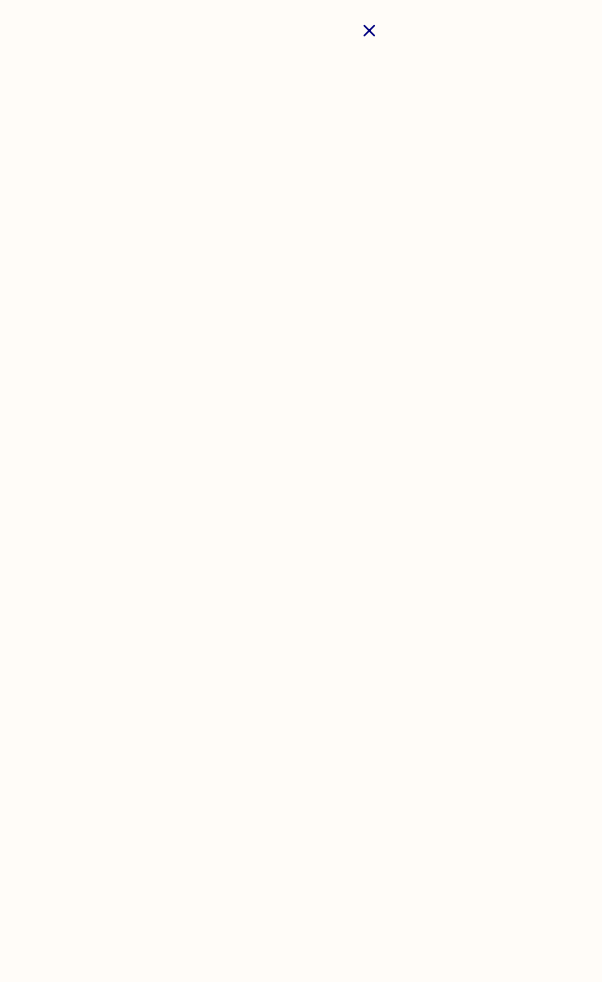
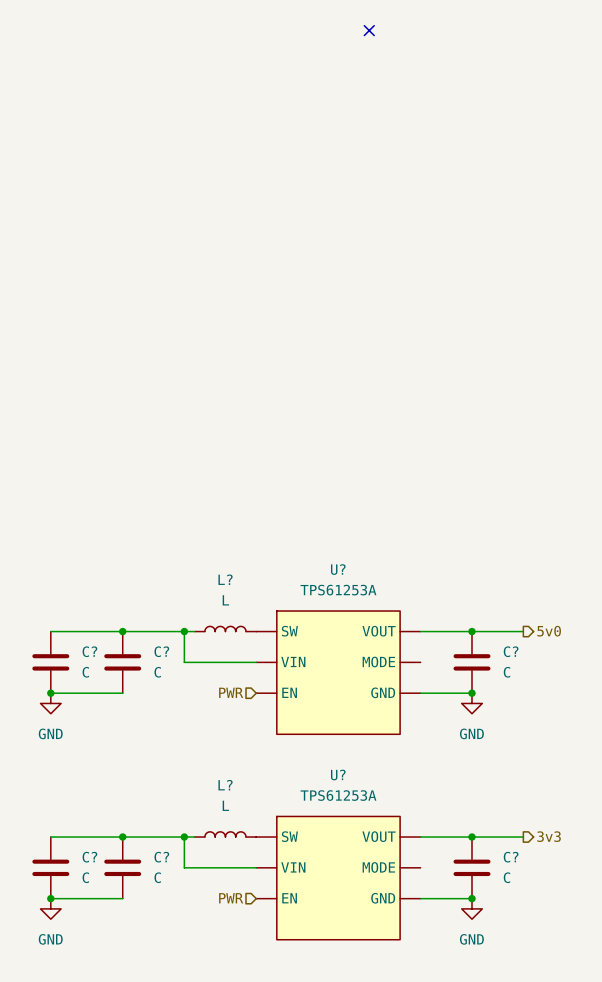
L?: none -> L (225, 628)
wire: none -> (50, 631) (194, 631)
junction: none -> (122, 631)
wire: none -> (184, 631) (184, 662) (256, 662)
junction: none -> (184, 631)
wire: none -> (420, 631) (523, 631)
junction: none -> (471, 631)
hierarchical label: none -> 5v0 (549, 631)
C?: none -> C (50, 662)
C?: none -> C (122, 662)
C?: none -> C (471, 662)
U?: none -> TPS61253A (338, 672)
hierarchical label: none -> PWR (231, 692)
wire: none -> (50, 693) (122, 693)
junction: none -> (50, 693)
wire: none -> (420, 693) (471, 693)
junction: none -> (471, 693)
power symbol: none -> GND (50, 703)
power symbol: none -> GND (471, 703)
L?: none -> L (225, 834)
hierarchical label: none -> 3v3 (549, 836)
wire: none -> (50, 837) (194, 837)
junction: none -> (122, 837)
wire: none -> (184, 837) (184, 867) (256, 867)
junction: none -> (184, 837)
wire: none -> (420, 837) (523, 837)
junction: none -> (471, 837)
C?: none -> C (50, 867)
C?: none -> C (122, 867)
C?: none -> C (471, 867)
U?: none -> TPS61253A (338, 878)
wire: none -> (50, 898) (122, 898)
junction: none -> (50, 898)
hierarchical label: none -> PWR (231, 898)
wire: none -> (420, 898) (471, 898)
junction: none -> (471, 898)
power symbol: none -> GND (50, 908)
power symbol: none -> GND (471, 908)

